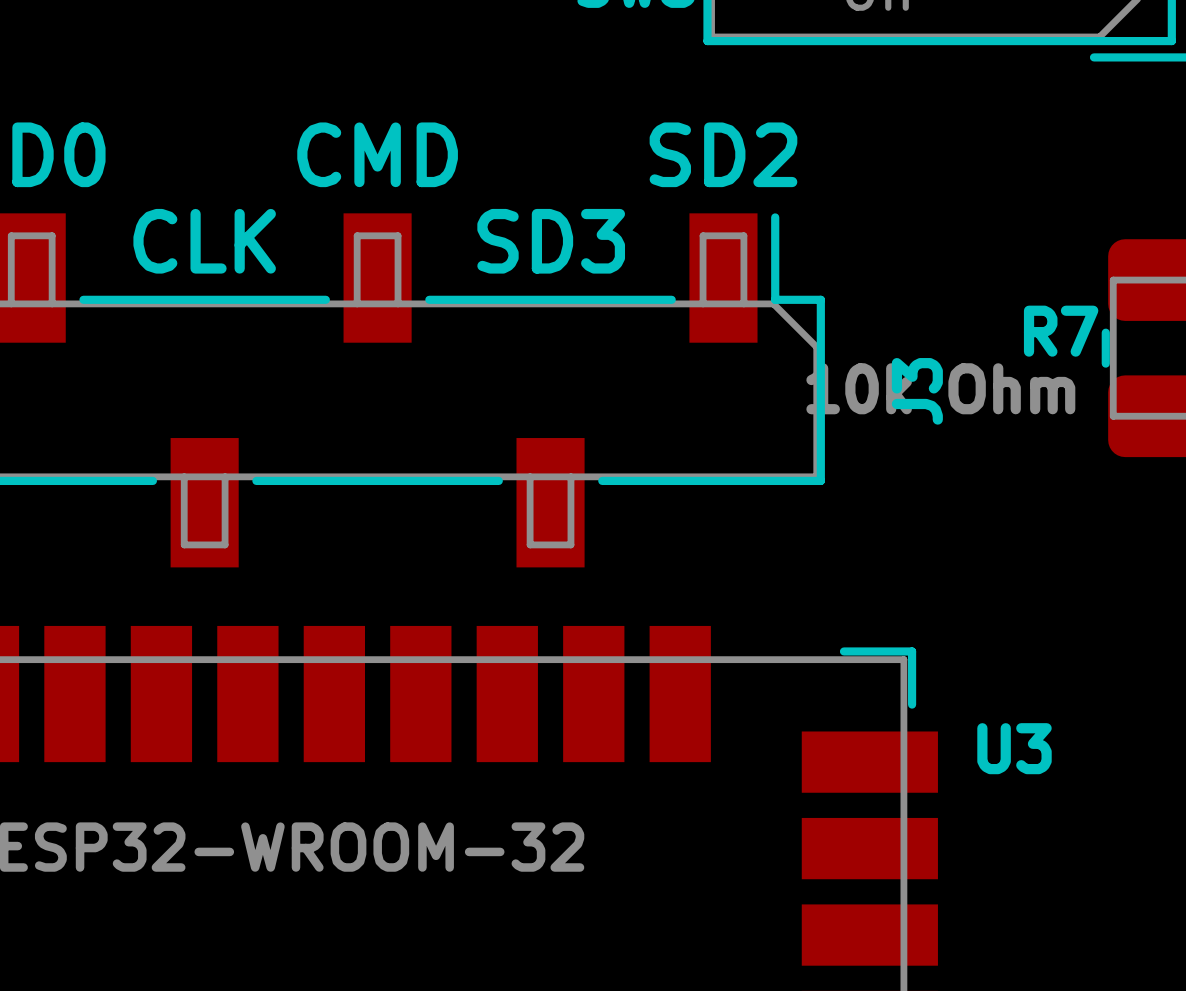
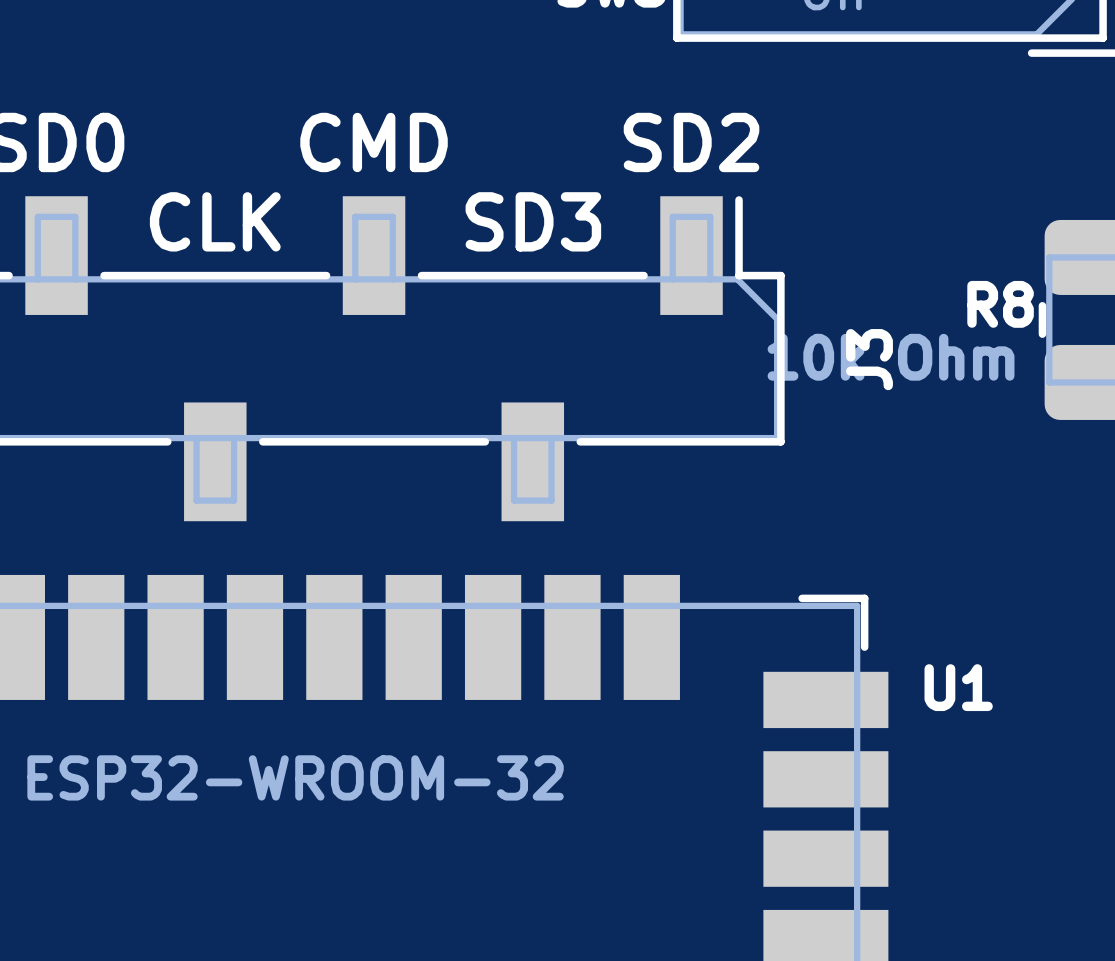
R7 name: R7 (1061, 331) -> R8 (1000, 304)
U3 name: U3 (1014, 748) -> U1 (958, 687)

